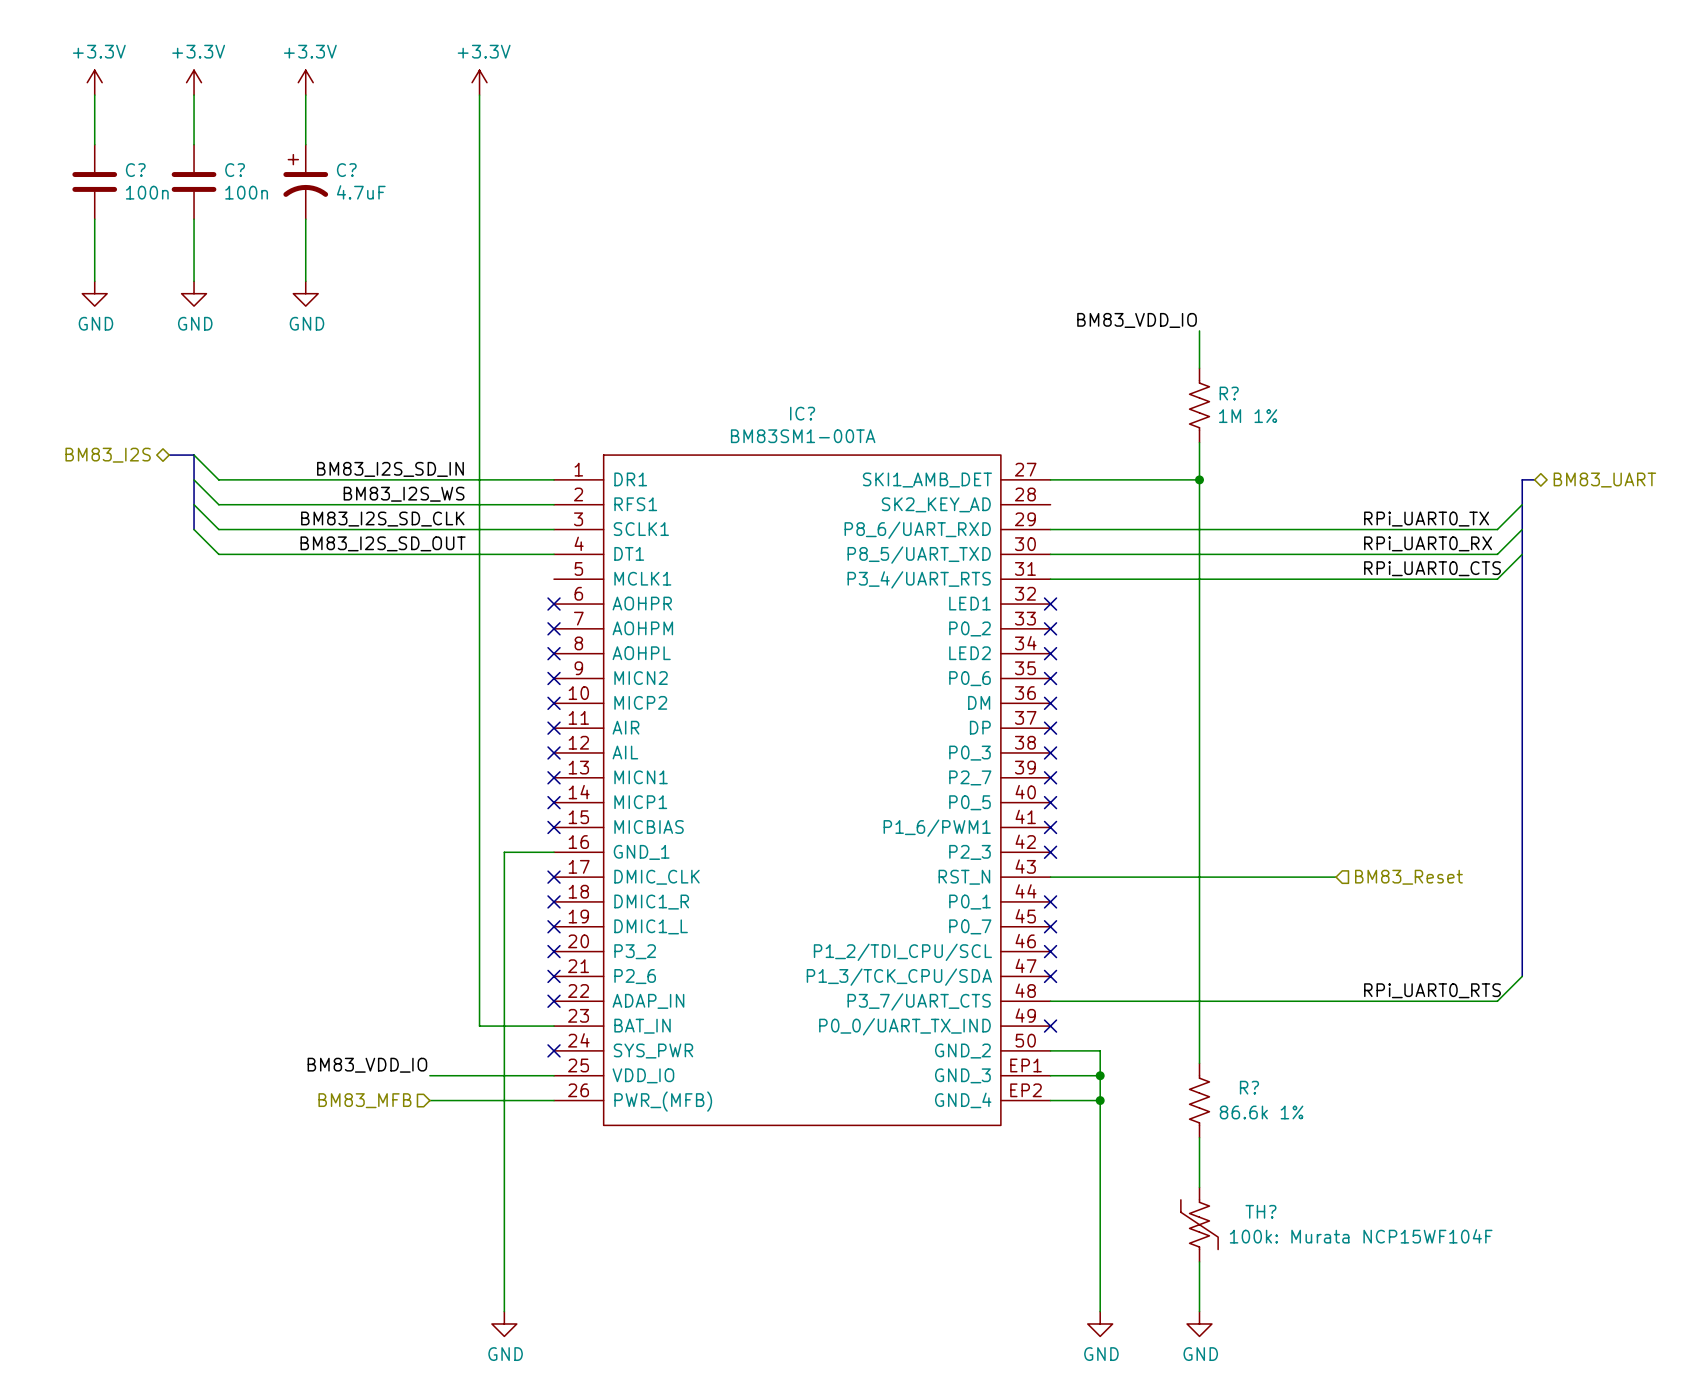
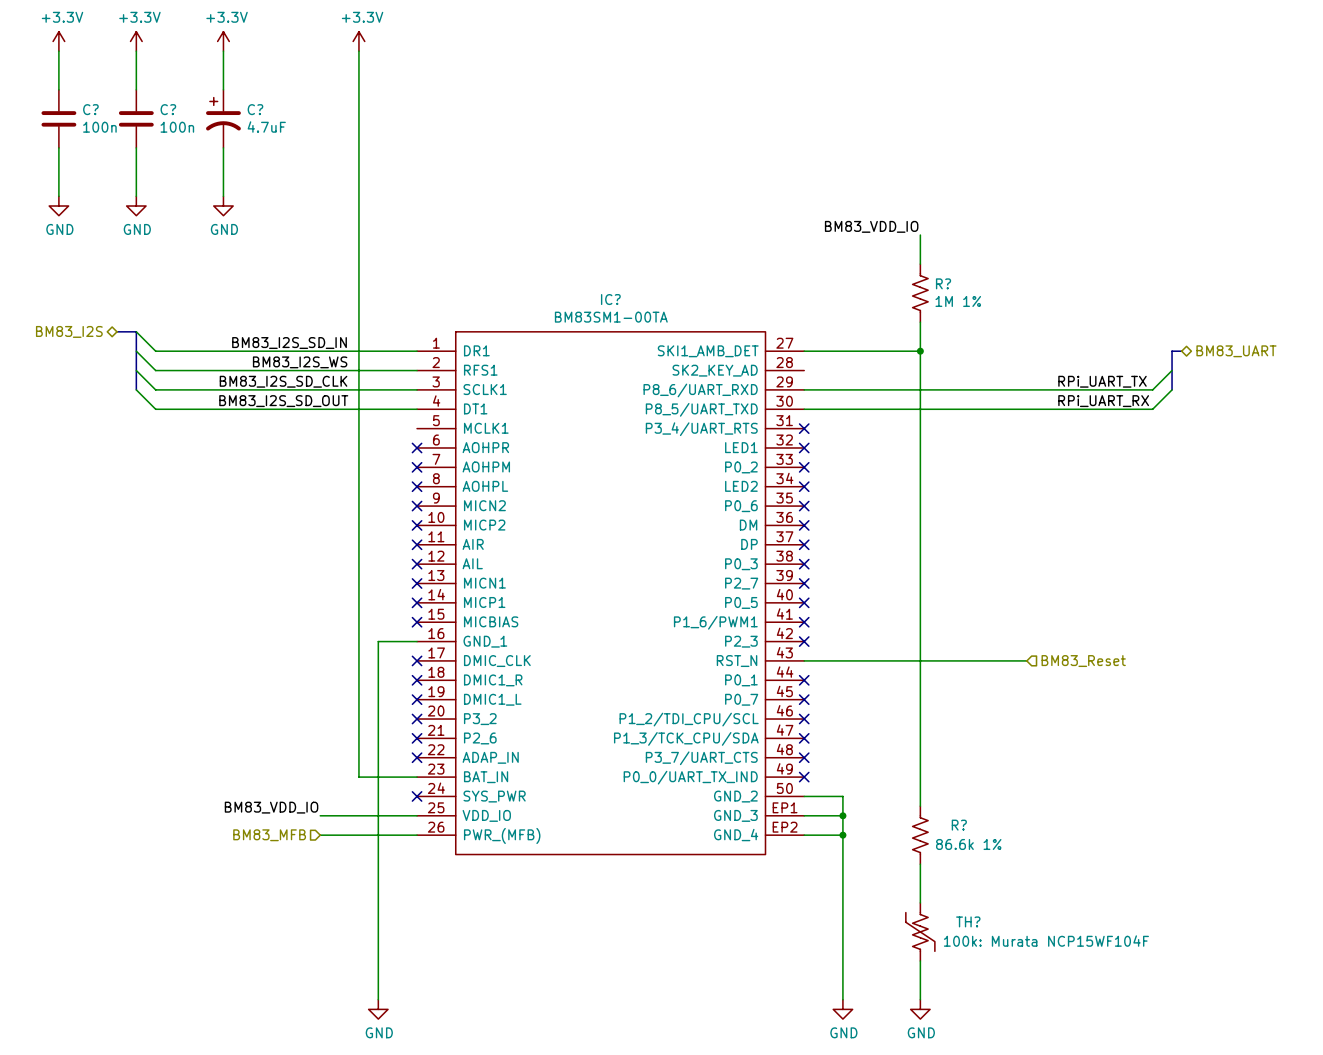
label: RPi_UART0_TX (1426, 519) -> RPi_UART_TX (1102, 381)
bus: (1522, 529) (1522, 976) -> none
label: RPi_UART0_RX (1428, 543) -> RPi_UART_RX (1103, 401)
wire: (1522, 554) (1497, 579) (1050, 579) -> none
label: RPi_UART0_CTS (1432, 568) -> none
no-connect mark: none -> (804, 428)
wire: (1522, 976) (1497, 1001) (1050, 1001) -> none
label: RPi_UART0_RTS (1432, 990) -> none
no-connect mark: none -> (804, 757)

